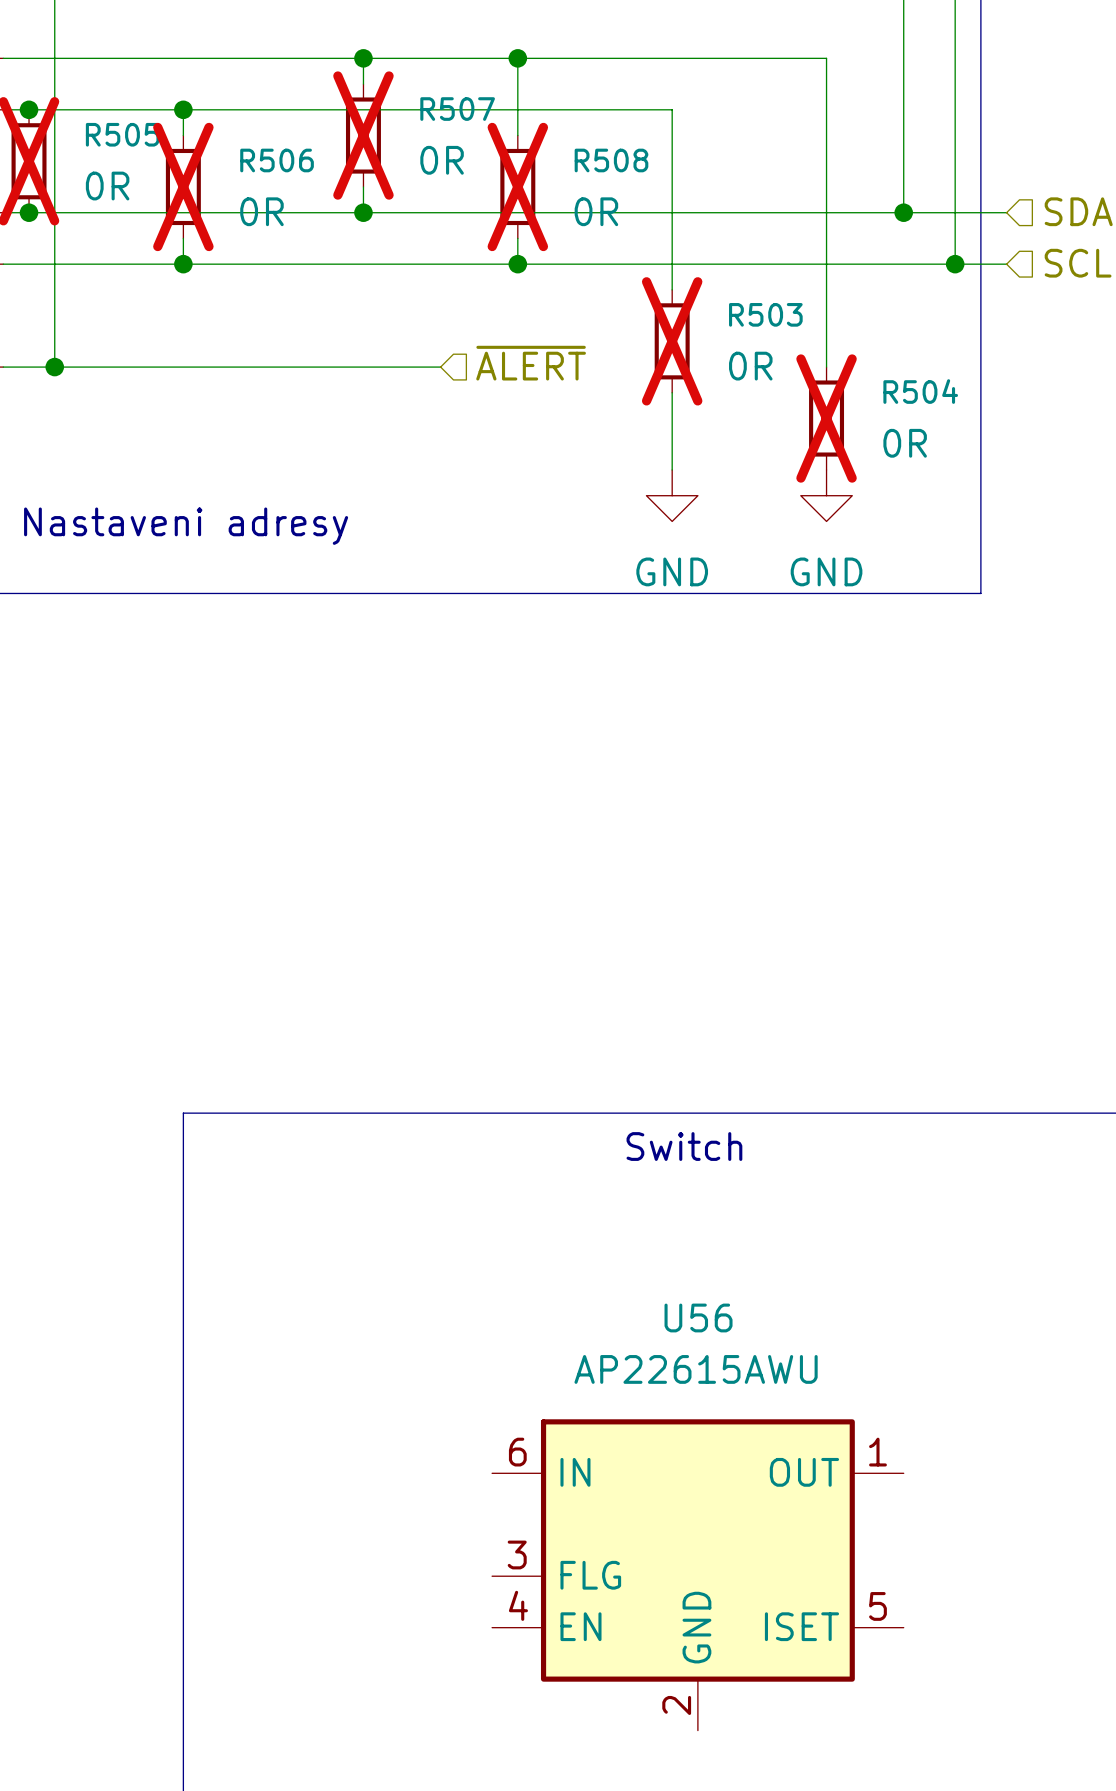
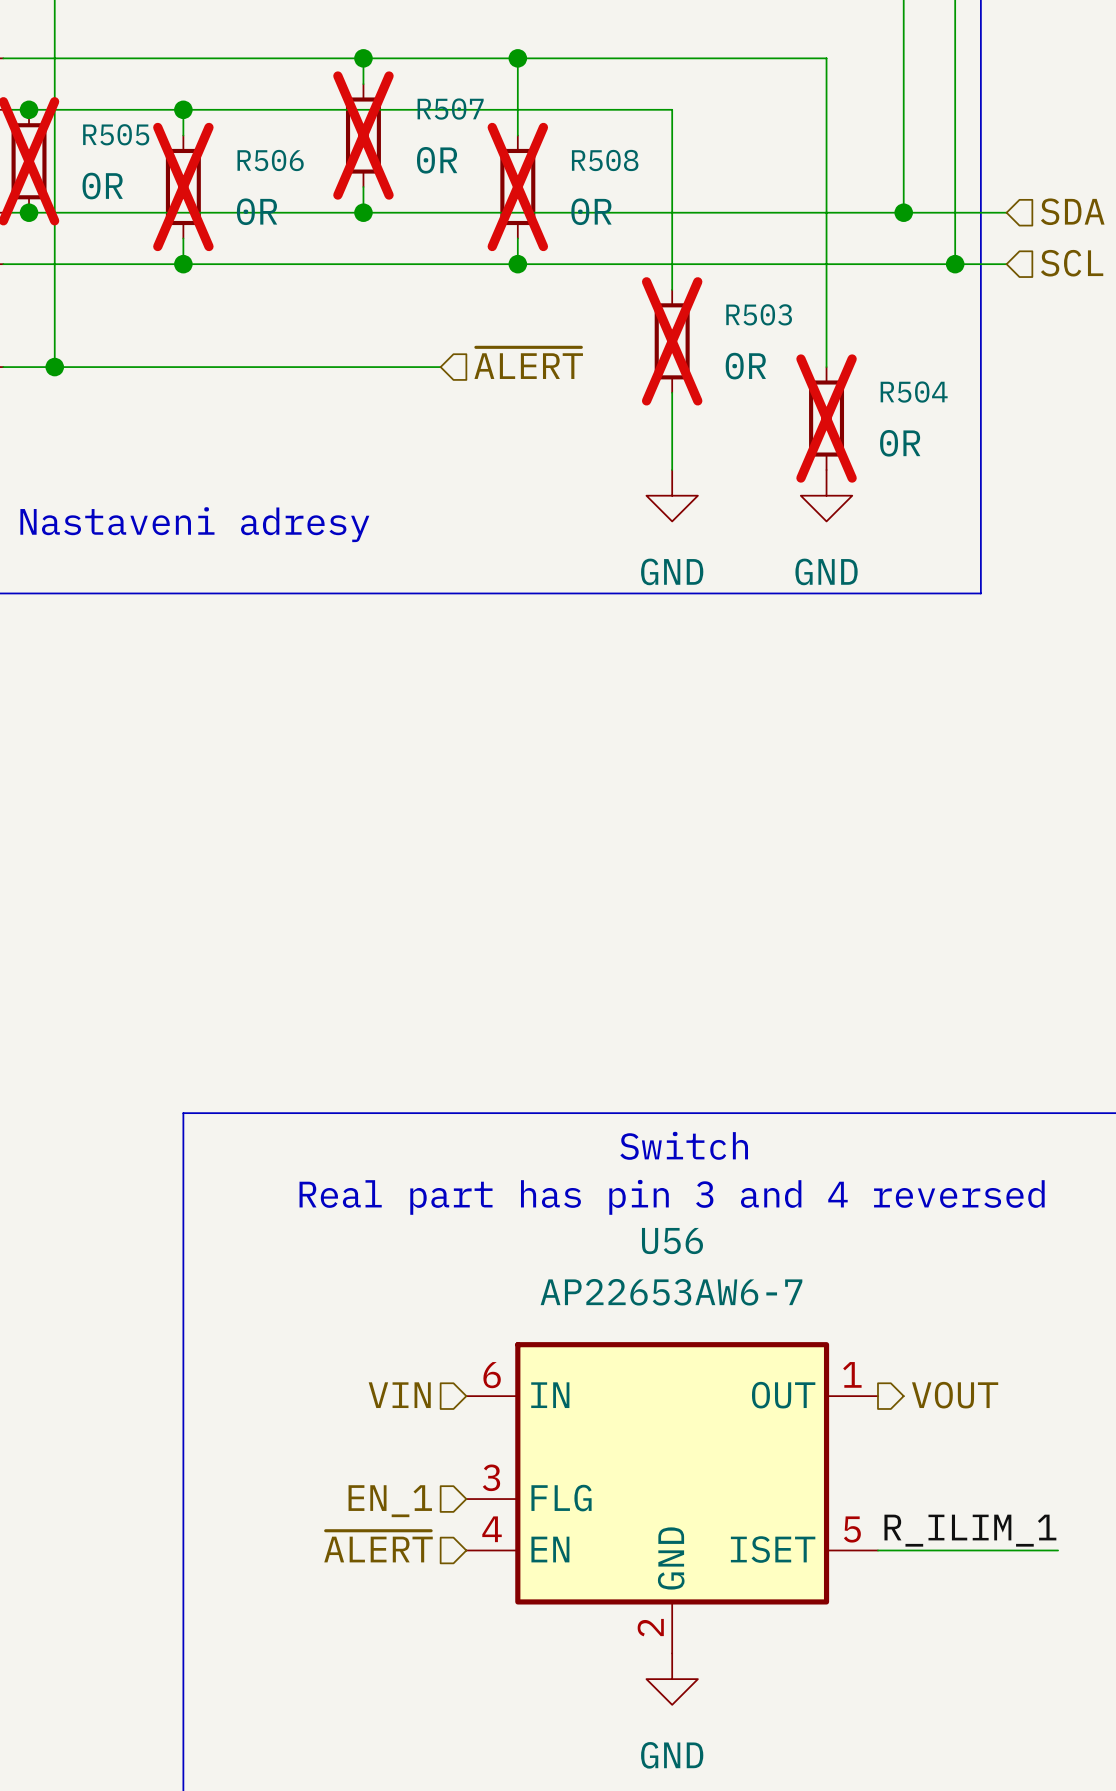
text: none -> Real part has pin 3 and 4 reversed (672, 1197)
U56 value: AP22615AWU (696, 1369) -> AP22653AW6-7 (671, 1292)
hierarchical label: none -> VIN (399, 1395)
hierarchical label: none -> VOUT (955, 1395)
hierarchical label: none -> EN_1 (390, 1501)
label: none -> R_ILIM_1 (970, 1530)
hierarchical label: none -> ~{ALERT} (378, 1546)
wire: none -> (877, 1550) (1058, 1550)
U56 position: (697, 1574) -> (672, 1497)
power symbol: none -> GND (672, 1679)

